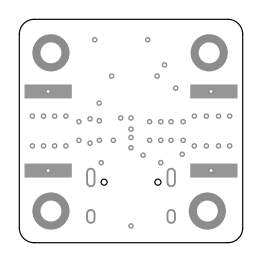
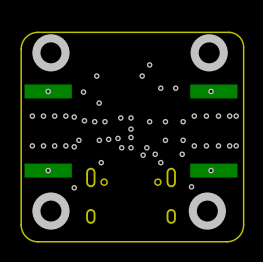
board edge: (227, 19) (34, 19) (23, 23) (19, 34) (19, 227) (23, 238) (34, 242) (227, 242) (239, 237) (242, 228) (242, 34) (238, 23) (227, 19) -> (228, 32) (239, 36) (243, 47) (243, 225) (238, 236) (226, 241) (37, 241) (26, 236) (21, 225) (21, 49) (26, 37) (37, 32) (228, 32)
via: (94, 39) -> none
via: (147, 39) -> none
via: none -> (149, 64)
via: (164, 64) -> none
via position: (111, 76) -> (96, 76)
via: none -> (142, 76)
via: (157, 76) -> none
via: none -> (160, 88)
via: none -> (83, 92)
via: none -> (236, 116)
via: none -> (74, 117)
via: (90, 118) -> none
via: none -> (84, 120)
via: (99, 120) -> none
via: (78, 121) -> none
via: none -> (94, 121)
via: none -> (104, 121)
via: (160, 121) -> none
via: none -> (165, 121)
via: (171, 121) -> none
via: none -> (117, 138)
via: none -> (108, 139)
via: (113, 140) -> none
via: (149, 140) -> none
via: (160, 140) -> none
via: none -> (165, 140)
via: (171, 140) -> none
via: (90, 143) -> none
via: none -> (236, 145)
via: none -> (74, 146)
via: none -> (121, 147)
via: none -> (146, 147)
via: none -> (155, 154)
via: none -> (191, 186)
via: none -> (74, 187)
via: (131, 225) -> none

